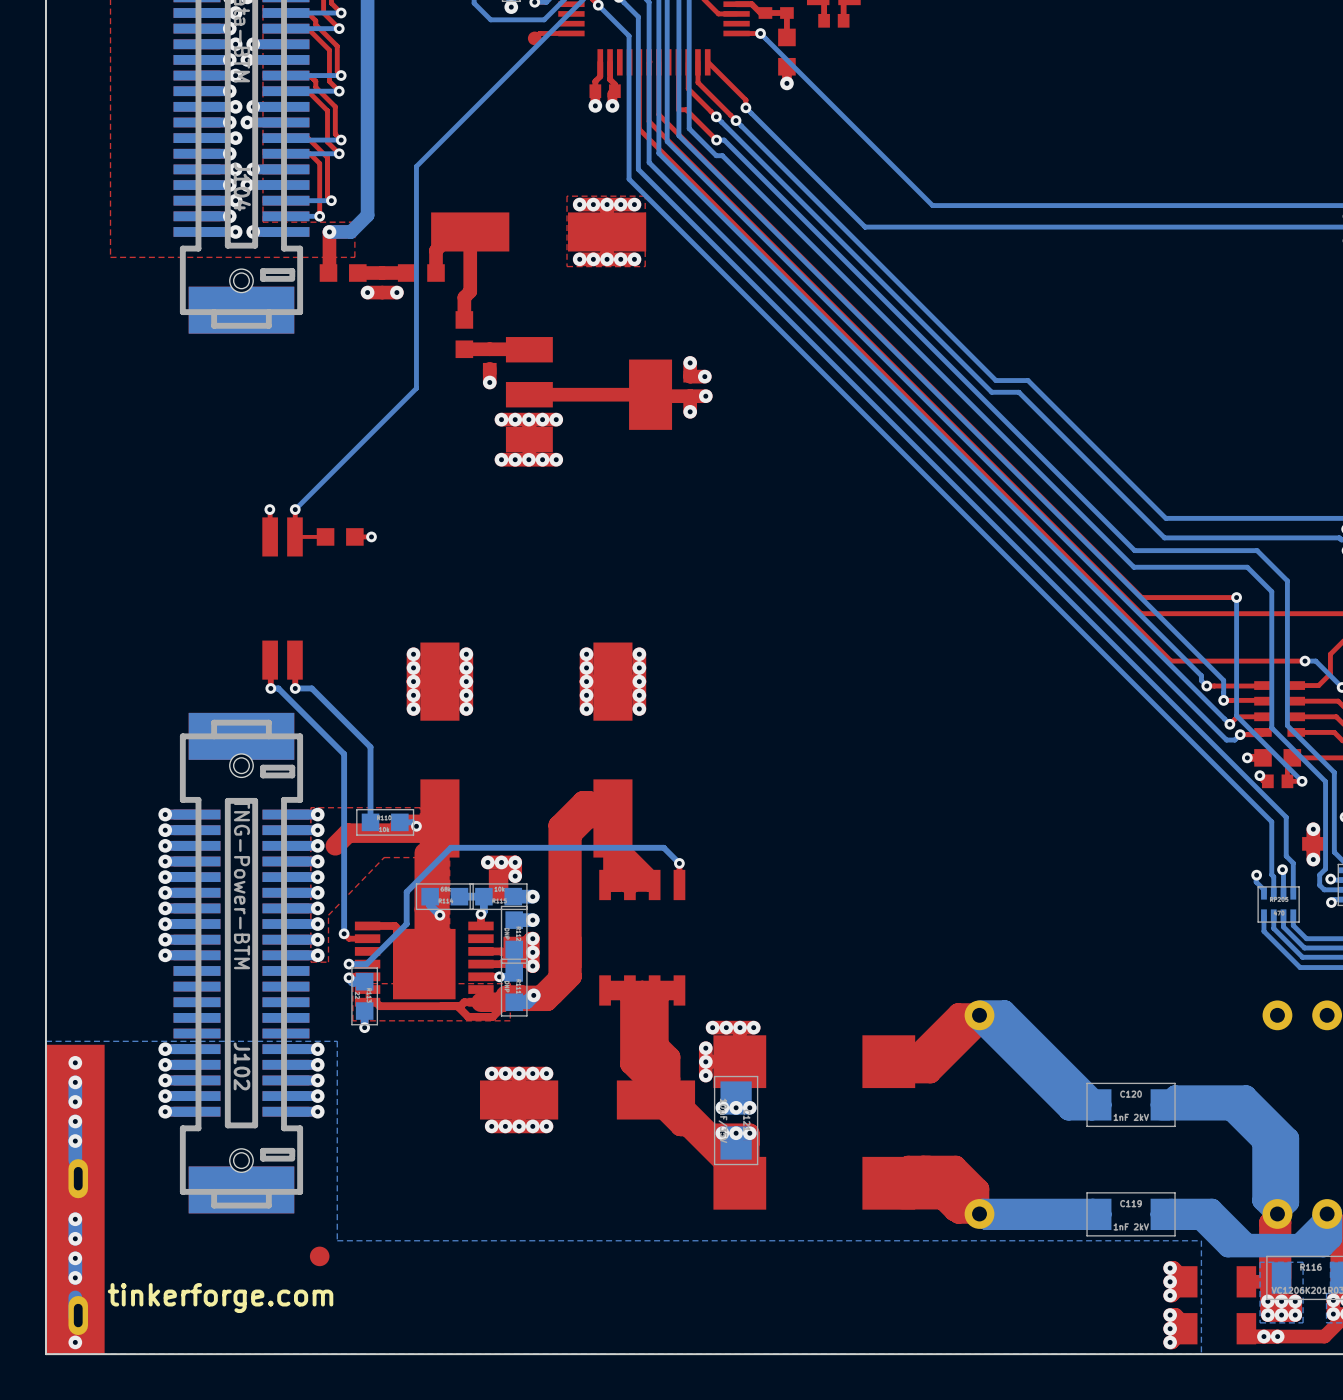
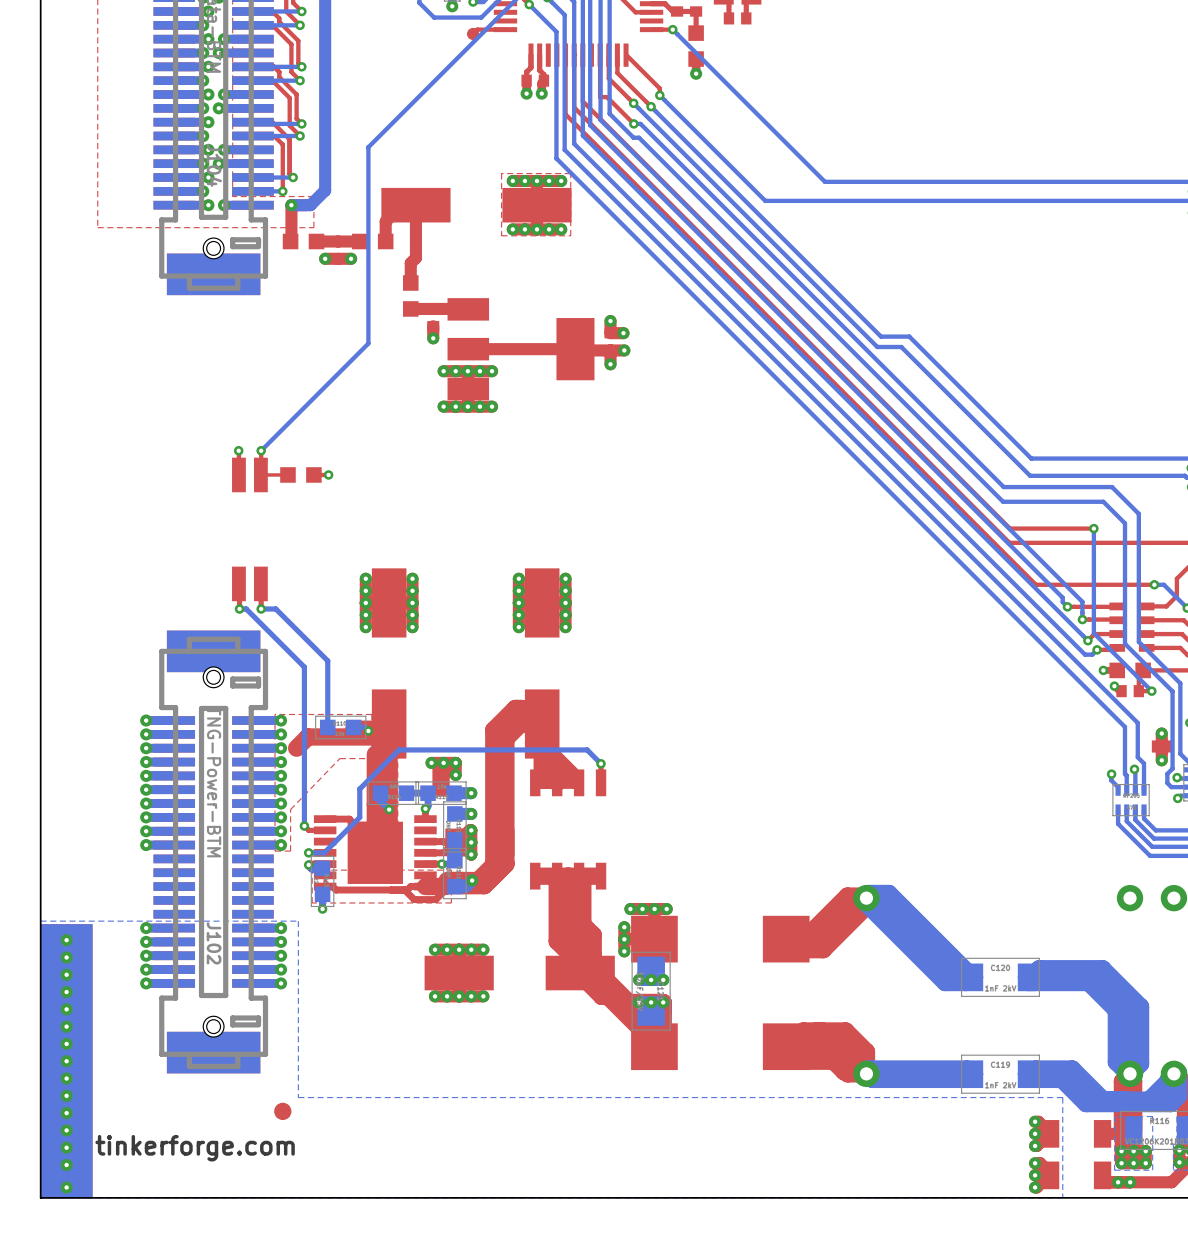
part footprint: [45, 1044, 105, 1355] -> [40, 924, 93, 1199]
via: none -> (66, 1026)
via: none -> (66, 1043)
via: none -> (66, 1061)
via: none -> (66, 1147)
via: none -> (66, 1165)

